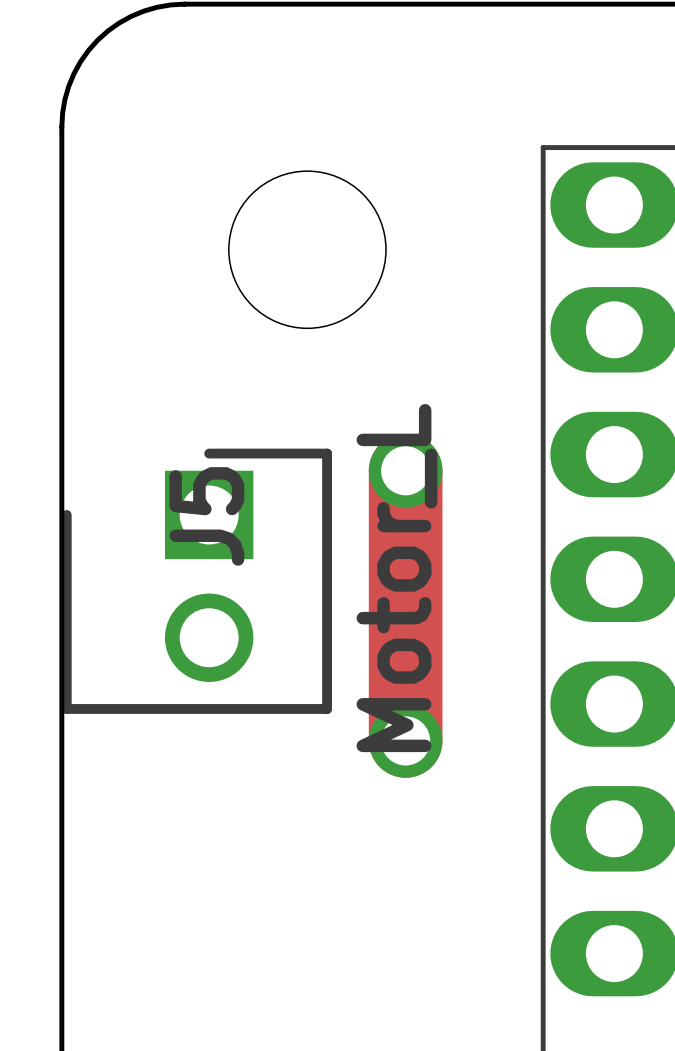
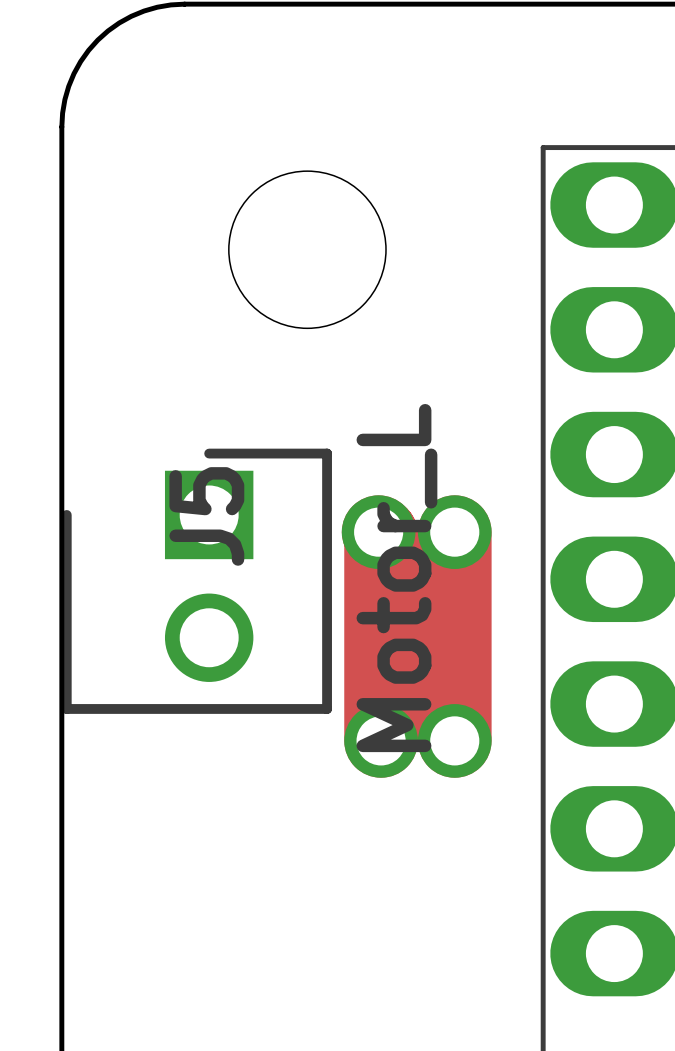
track: (405, 470) (405, 740) -> none
via: (405, 470) -> none
track: none -> (378, 532) (381, 534) (381, 740)
via: none -> (378, 532)
track: none -> (454, 532) (454, 740)
via: none -> (454, 532)
via: none -> (381, 740)
via: (405, 740) -> none
via: none -> (454, 740)

